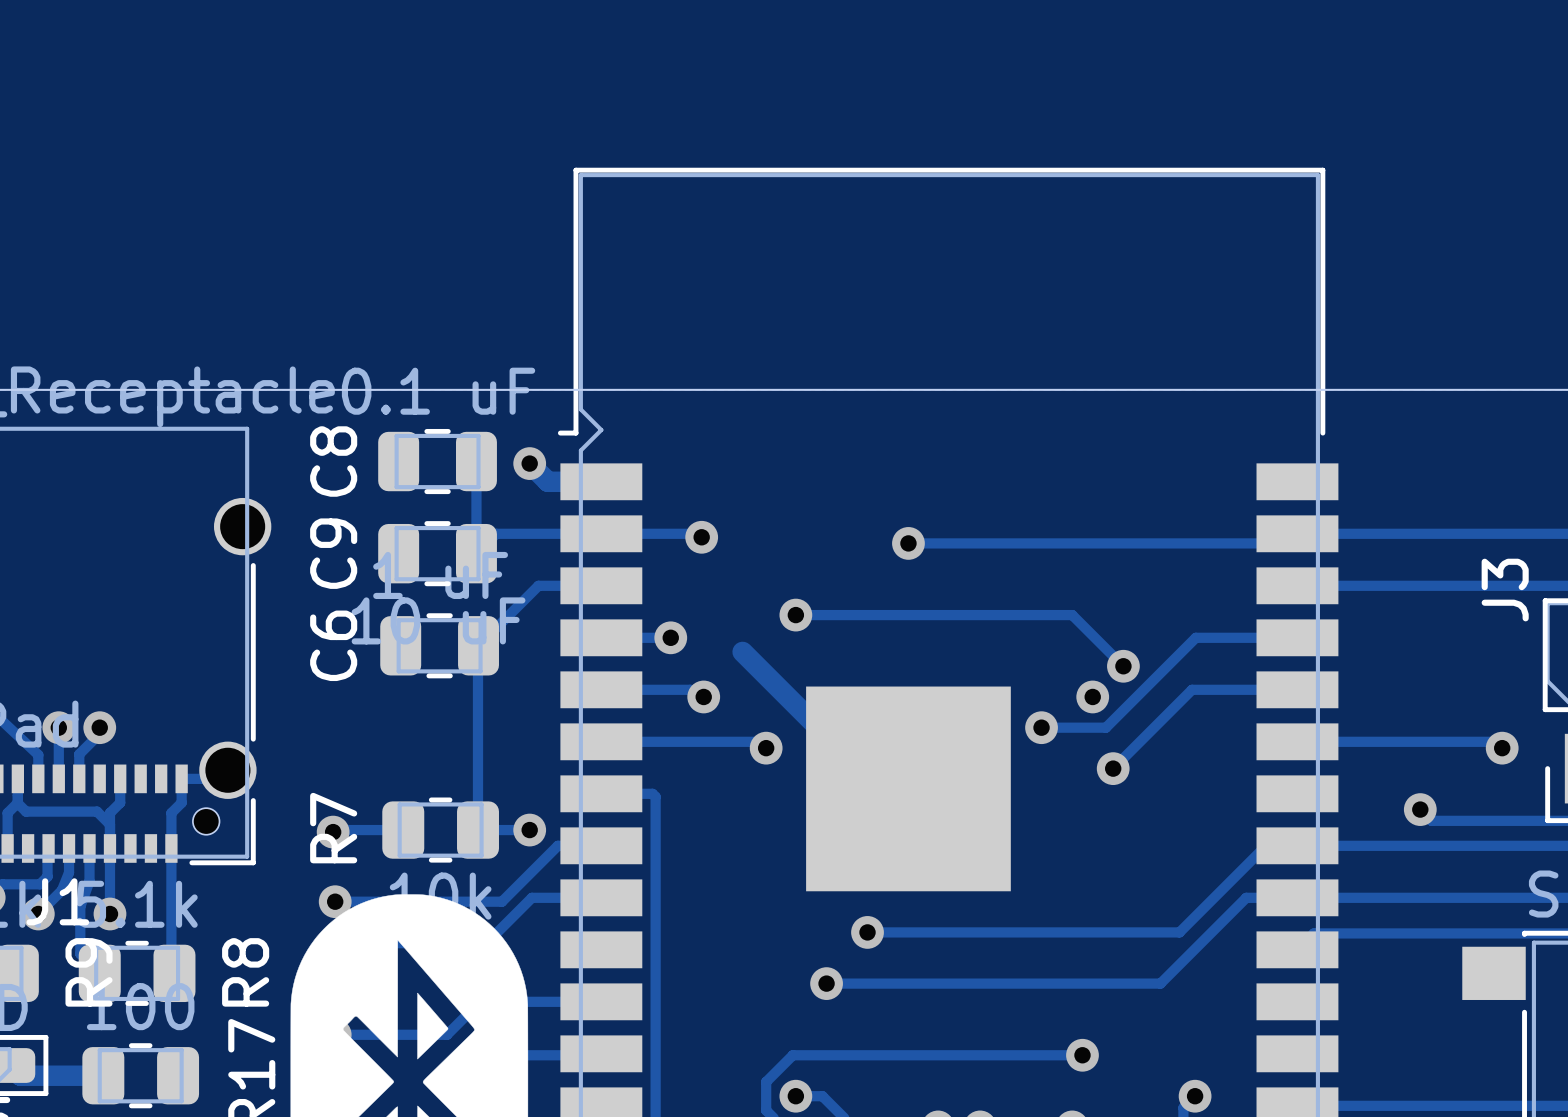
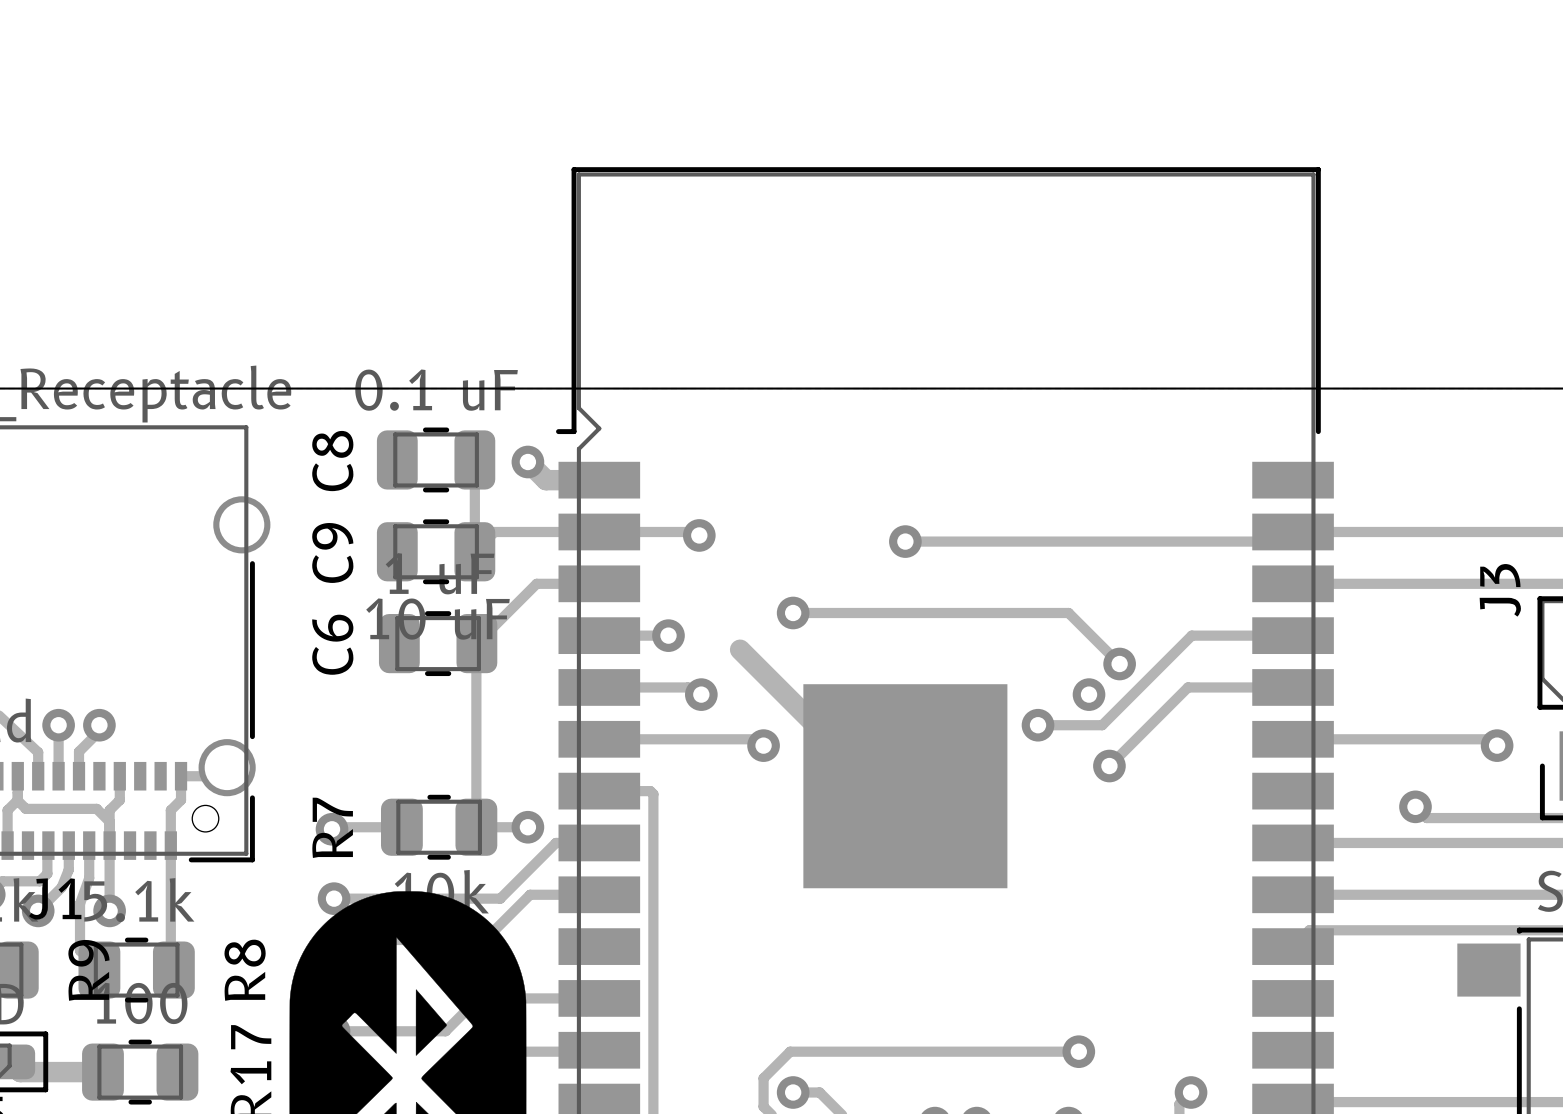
track: (1266, 845) (1179, 932) (867, 932) -> none
track: (1297, 897) (1246, 897) (1160, 983) (826, 983) -> none
via: (867, 932) -> none
via: (826, 983) -> none

